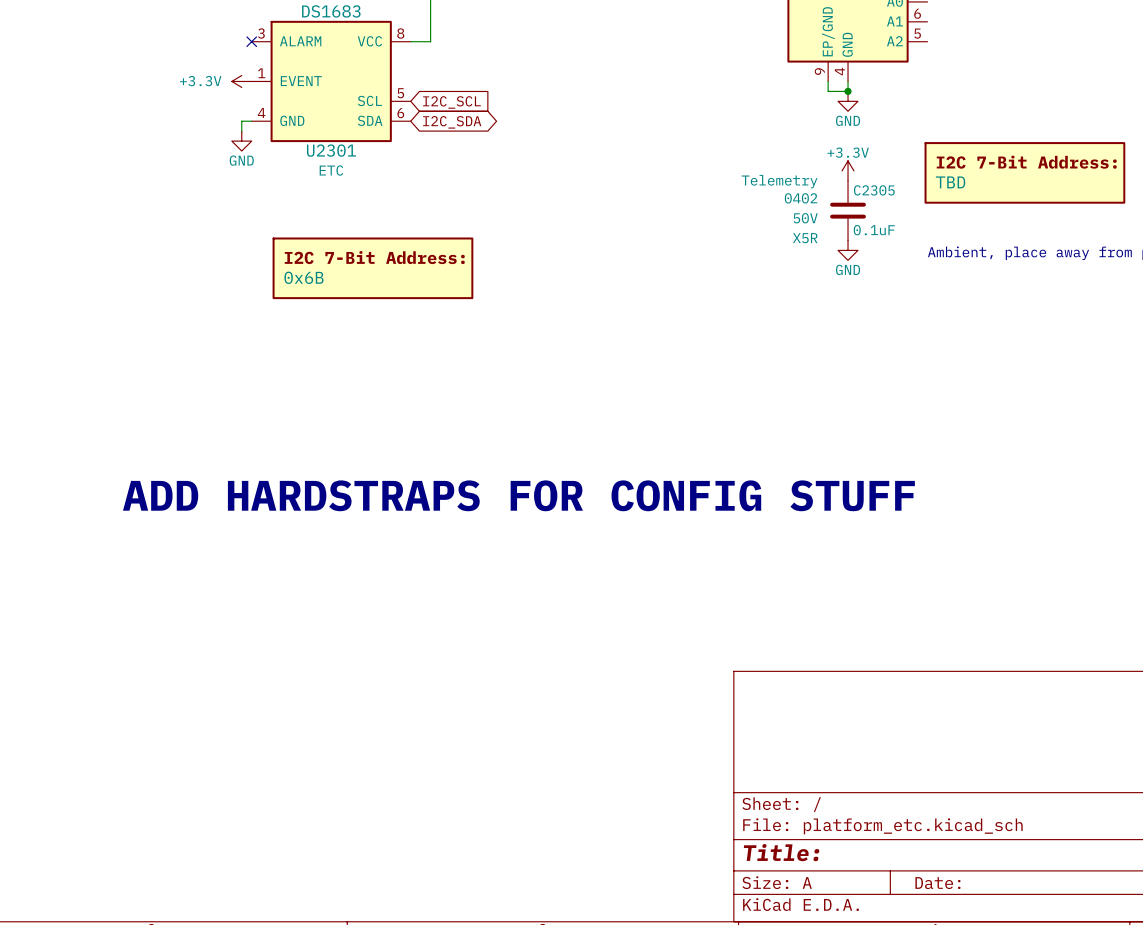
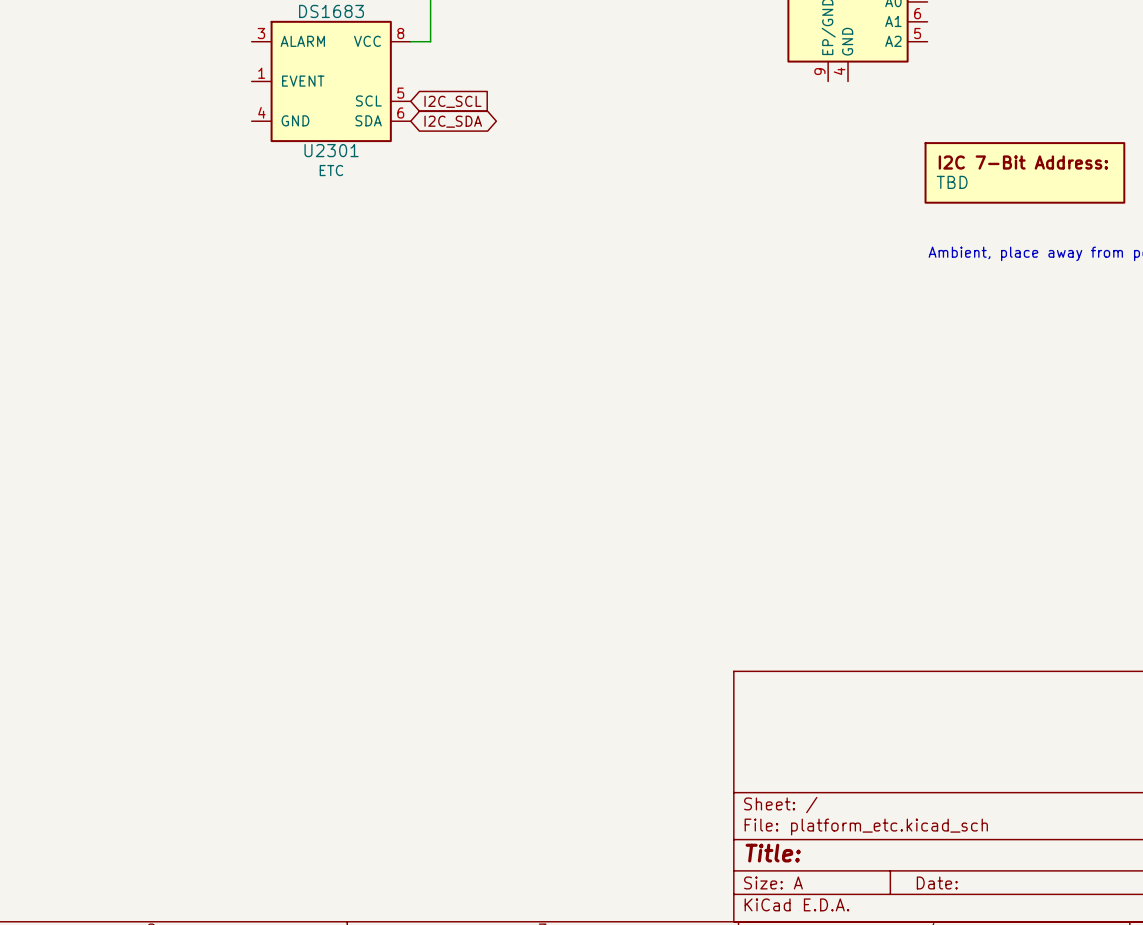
no-connect mark: (251, 41) -> none
power symbol: +3.3V (241, 81) -> none
wire: (828, 81) (828, 91) (848, 91) (848, 81) -> none
junction: (848, 91) -> none
power symbol: GND (848, 101) -> none
wire: (251, 121) (241, 121) (241, 131) -> none
power symbol: GND (241, 141) -> none
power symbol: +3.3V (848, 170) -> none
C2305: 0.1uF (848, 210) -> none
power symbol: GND (848, 250) -> none
part: 0x6B (372, 268) -> none
text: ADD HARDSTRAPS FOR CONFIG STUFF (518, 495) -> none

